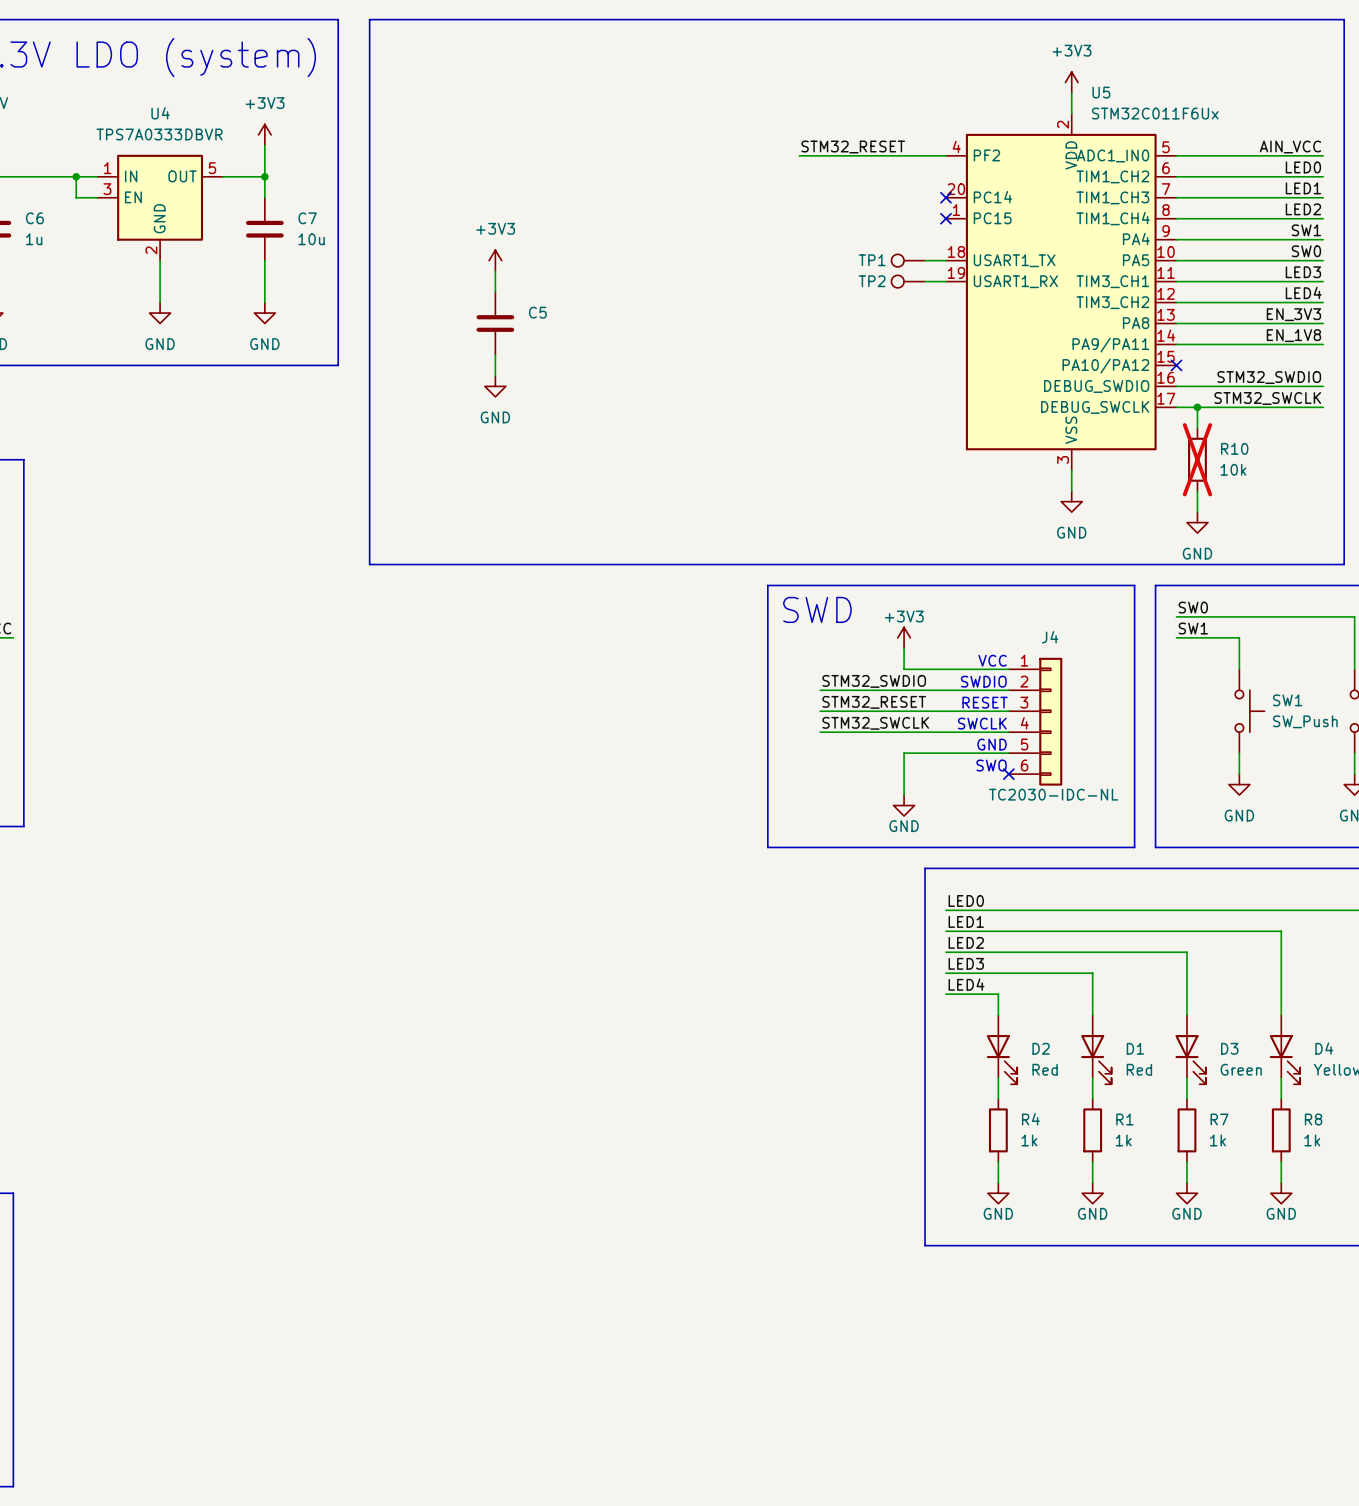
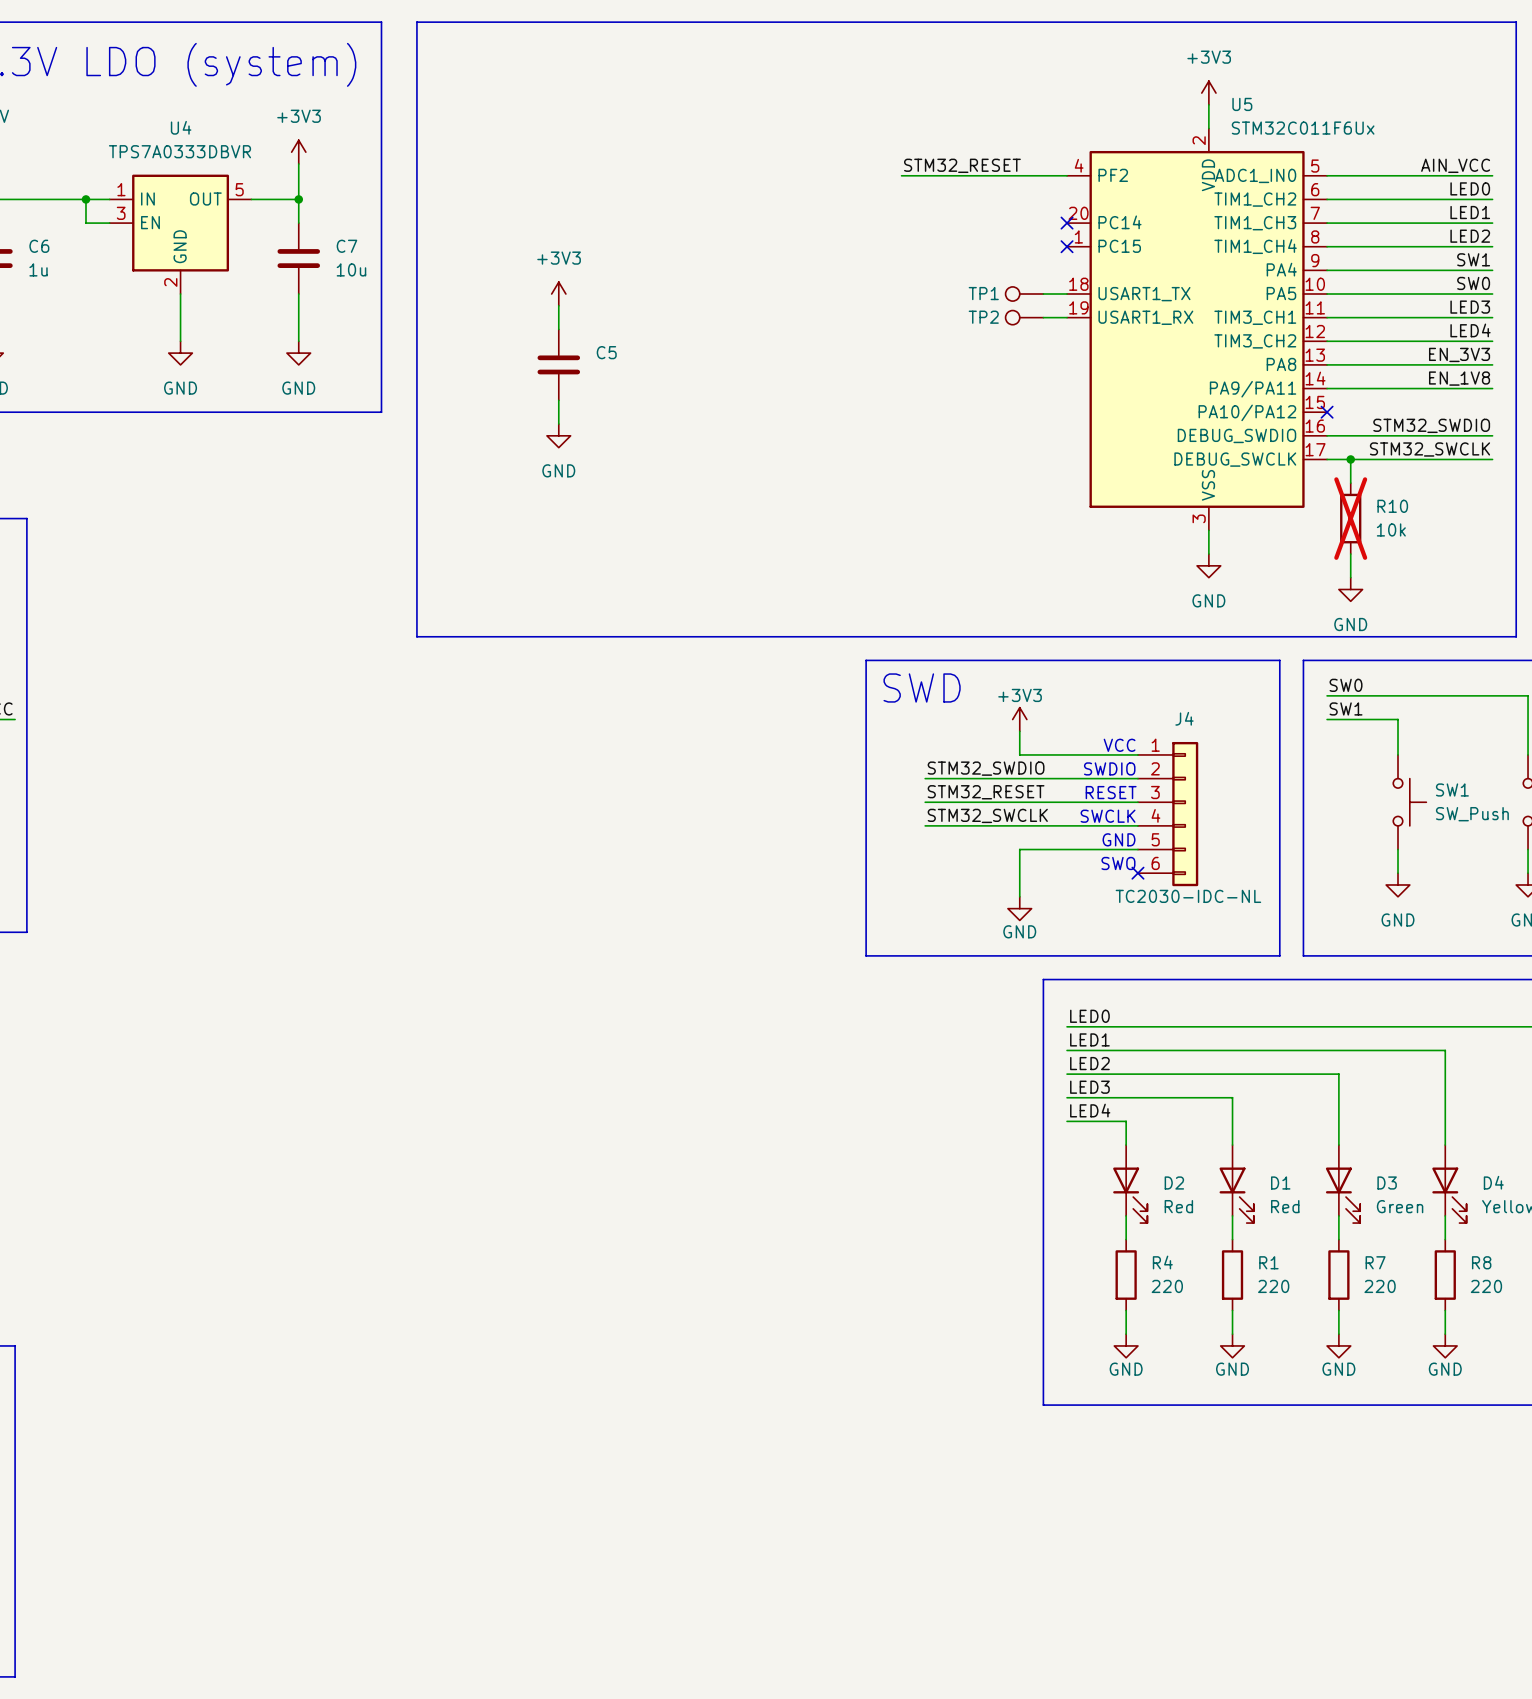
R4 value: 1k (1029, 1140) -> 220 (1167, 1286)
R1 value: 1k (1123, 1140) -> 220 (1273, 1286)
R7 value: 1k (1218, 1140) -> 220 (1380, 1286)
R8 value: 1k (1312, 1140) -> 220 (1486, 1286)

